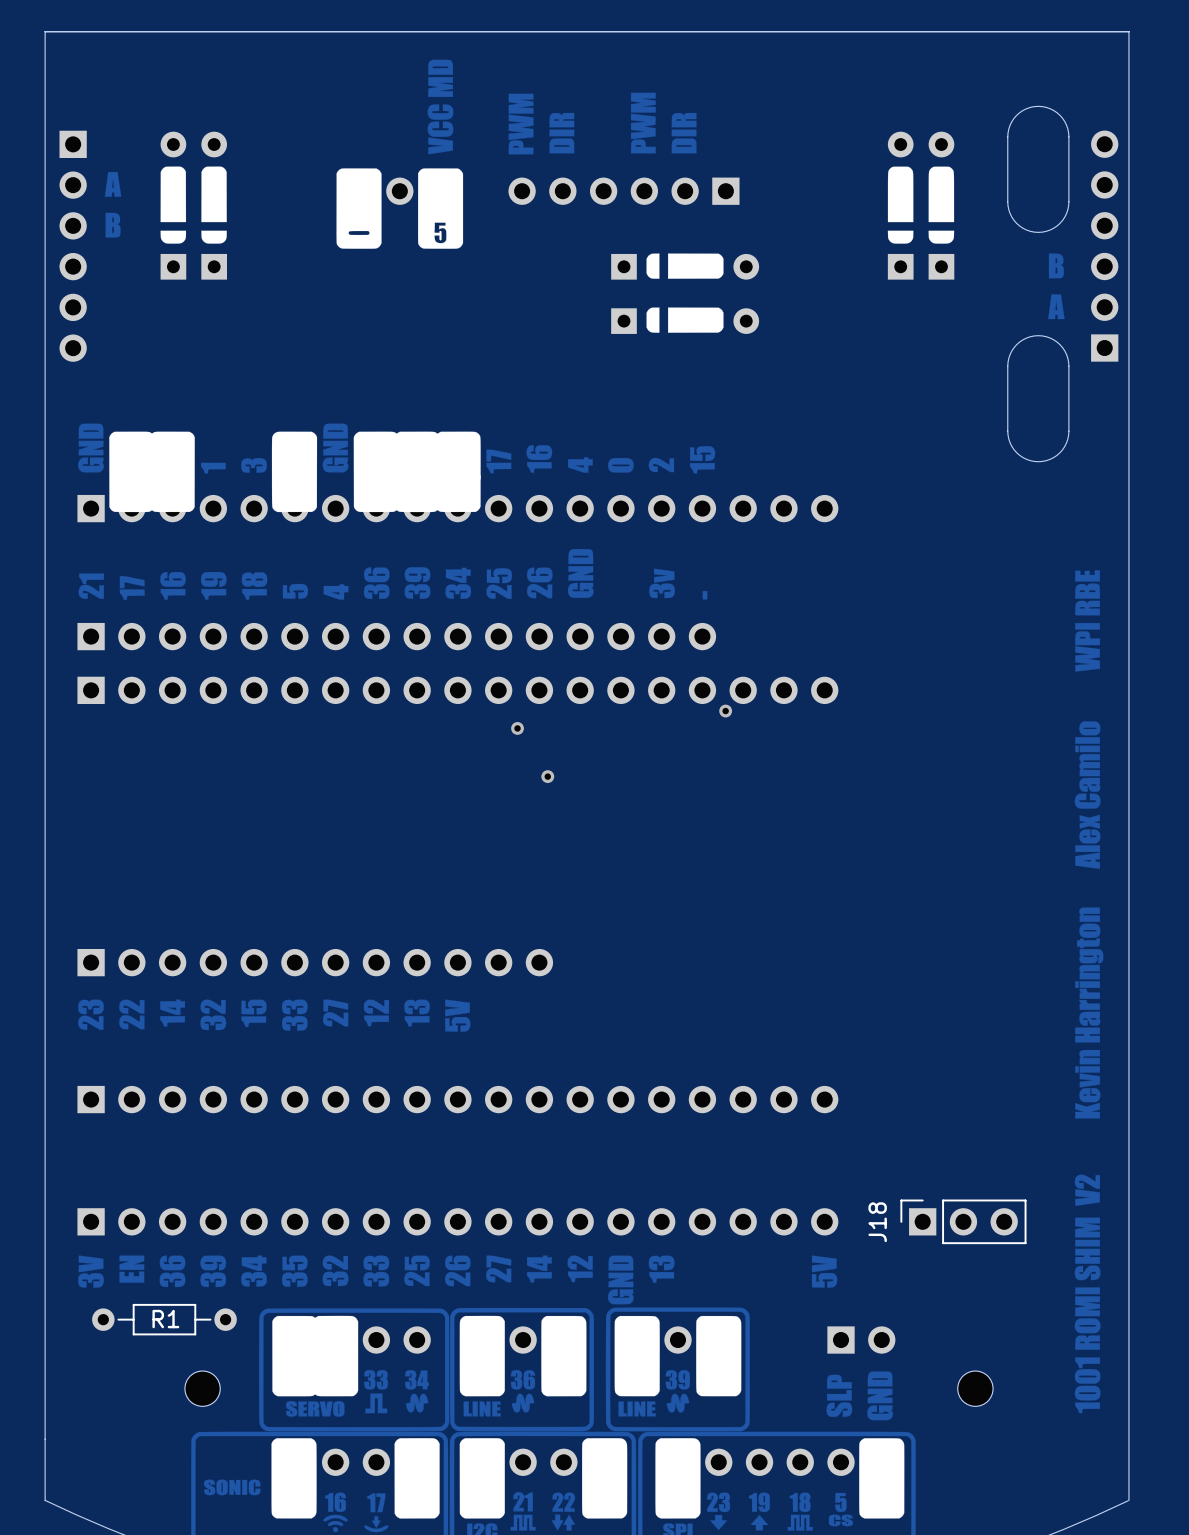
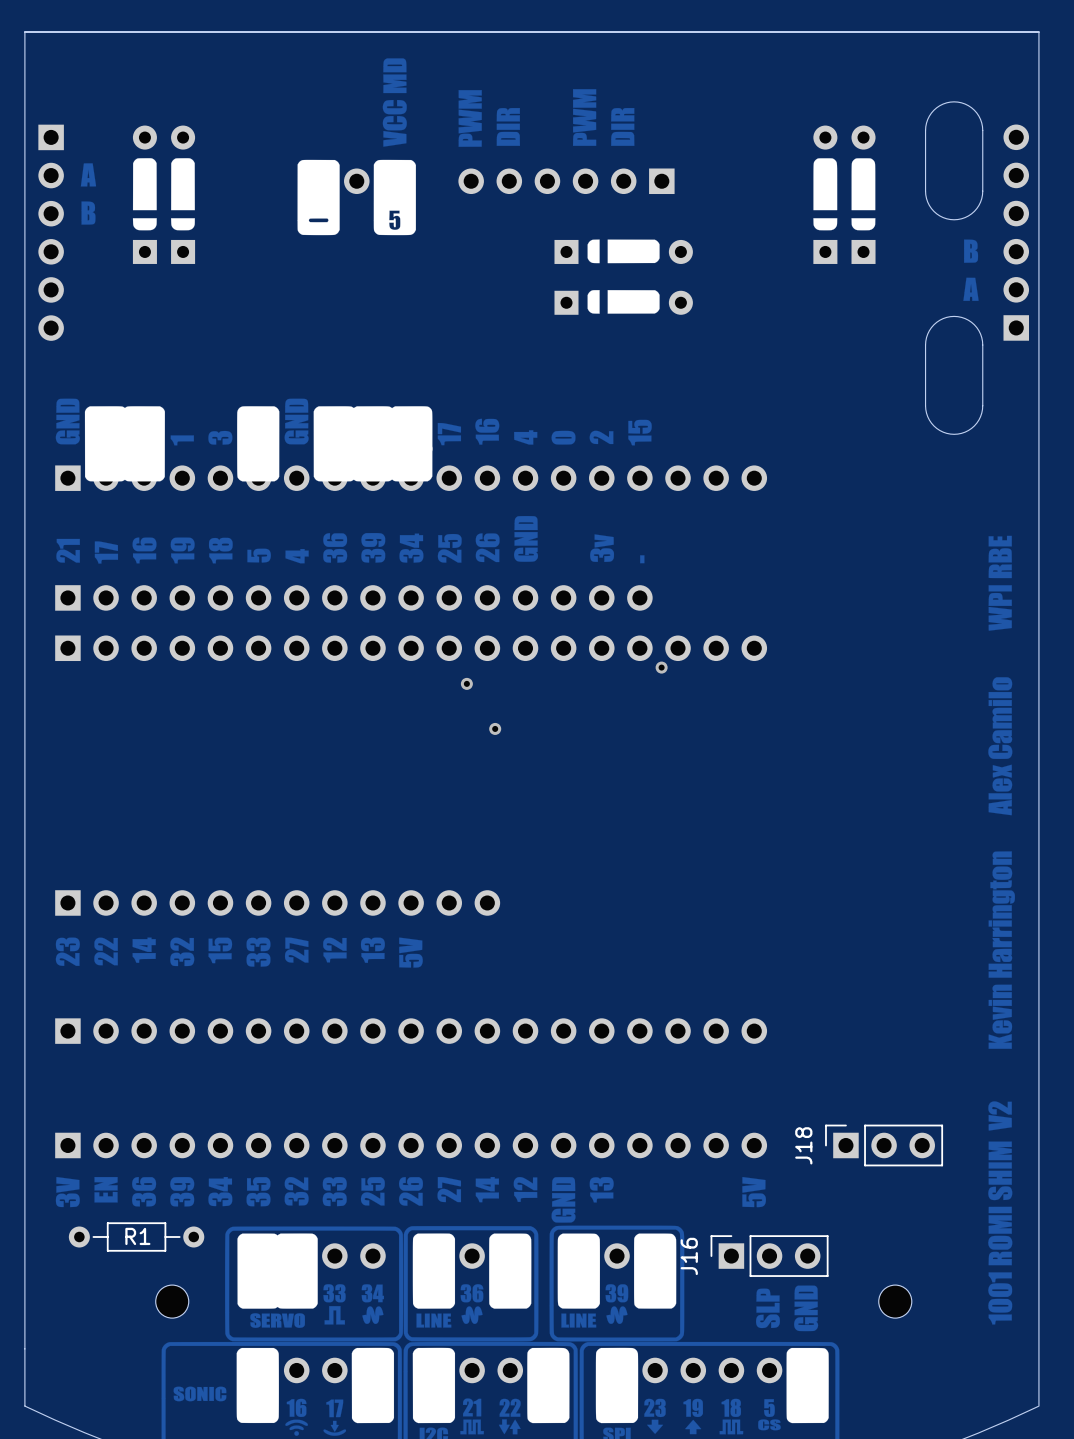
J16: none -> (769, 1256)
part: (861, 1340) -> none

